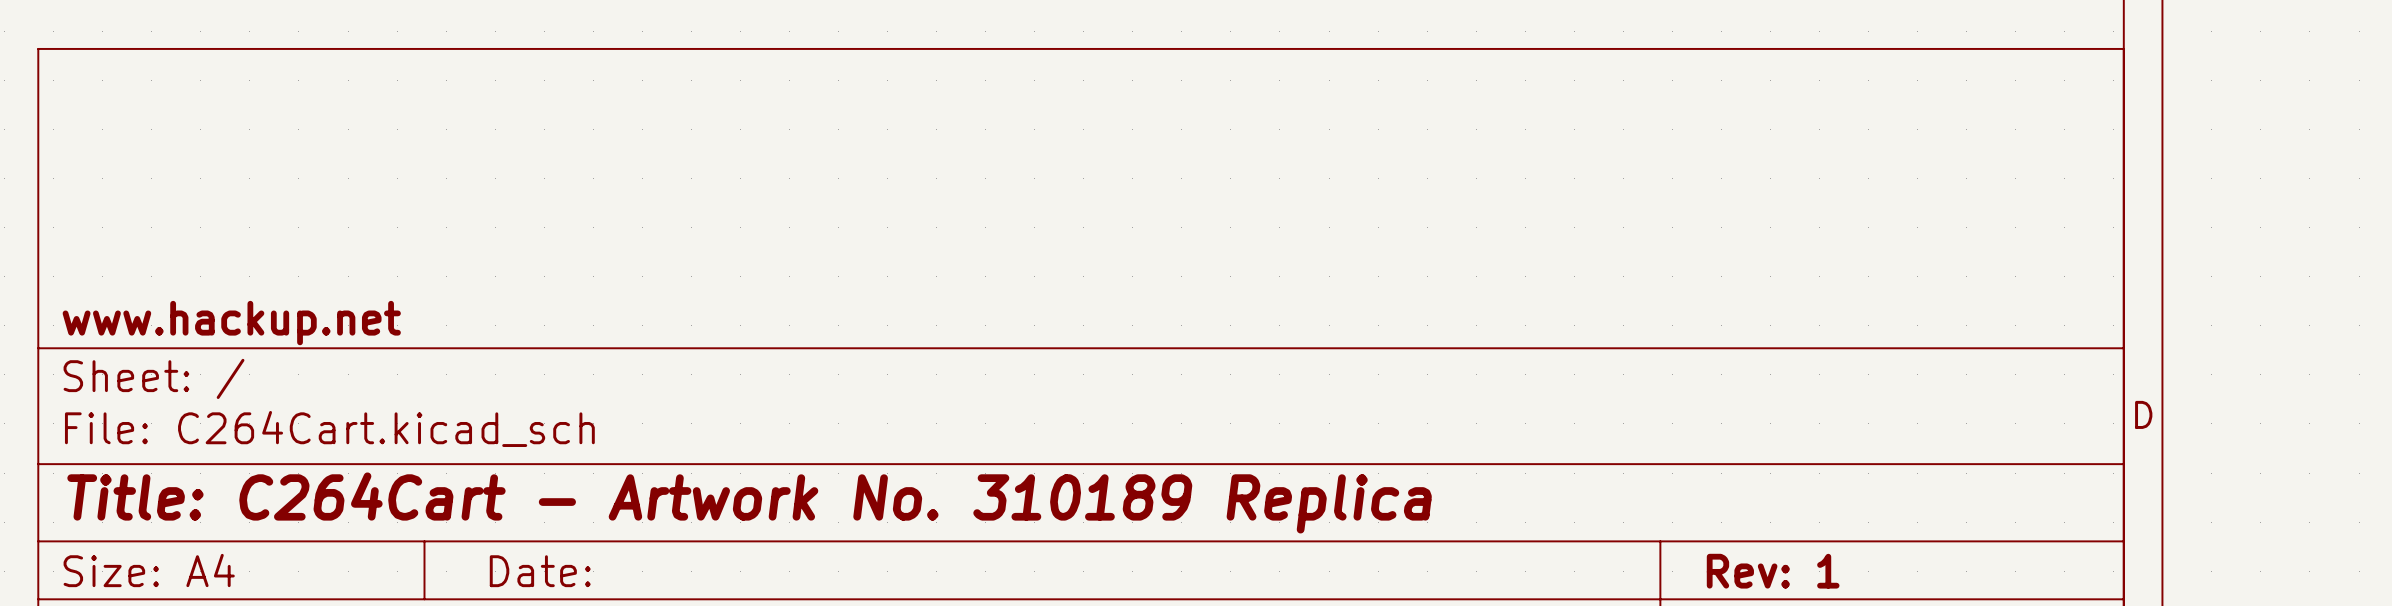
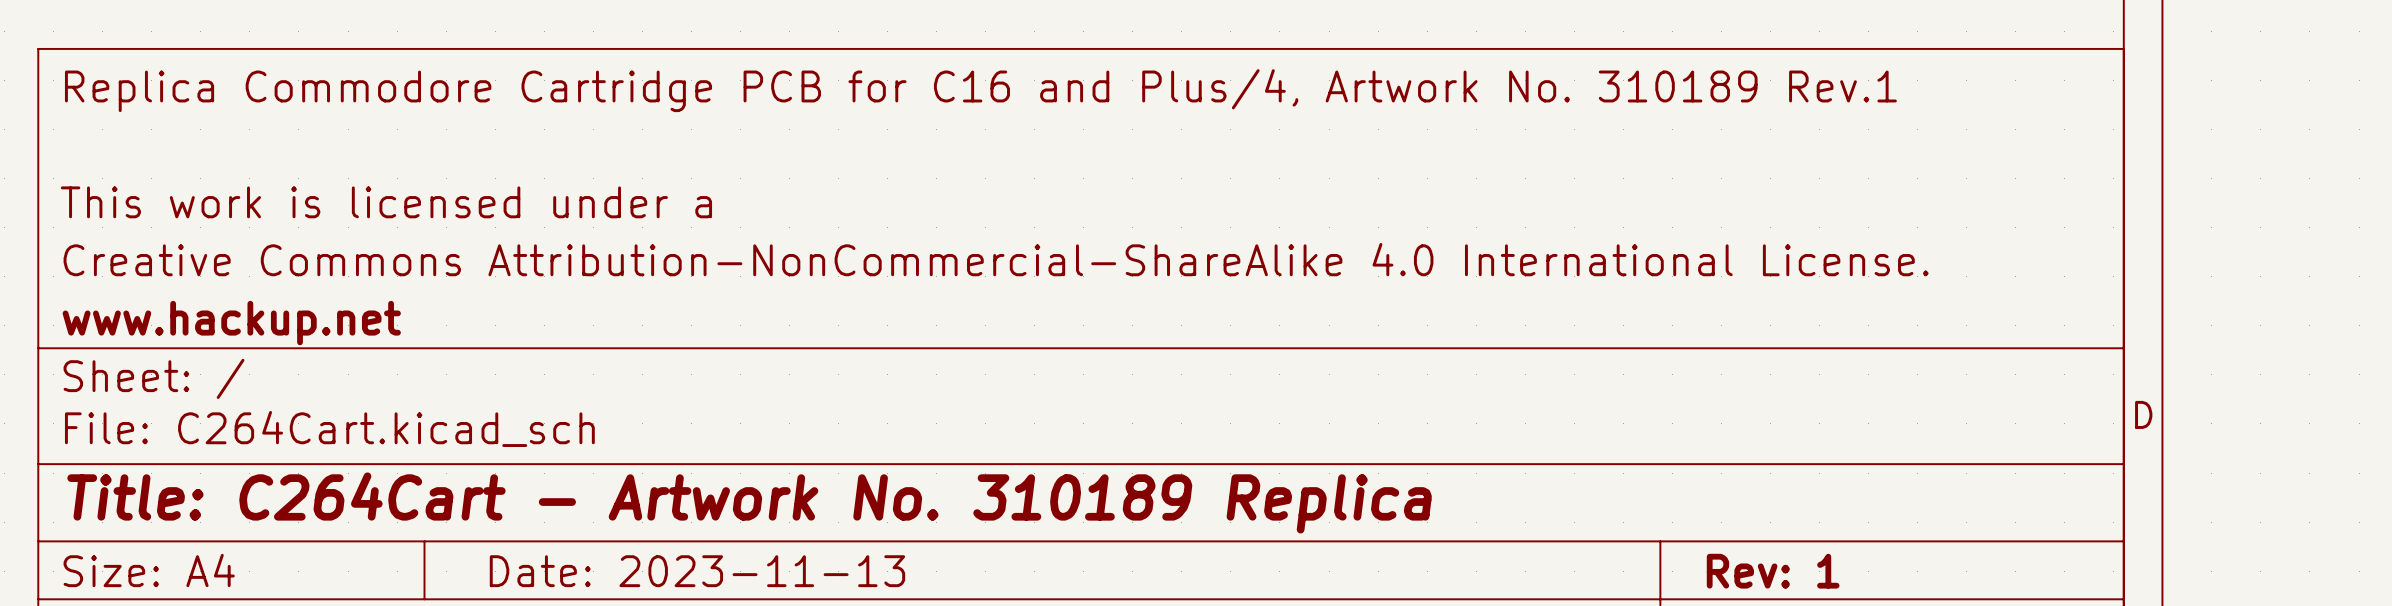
title block: none -> Replica Commodore Cartridge PCB for C16 and Plus/4, Artwork No. 310189 Rev.1 (980, 90)
title block: none -> This work is licensed under a (386, 202)
title block: none -> Creative Commons Attribution-NonCommercial-ShareAlike 4.0 International License. (996, 259)
title block: Date: (540, 571) -> Date: 2023-11-13 (697, 571)

